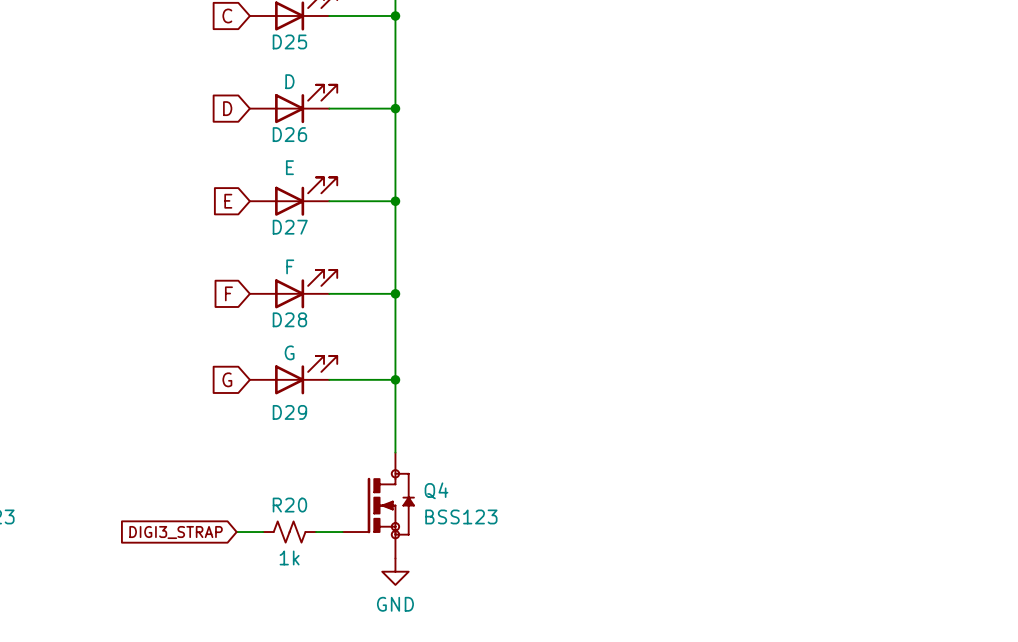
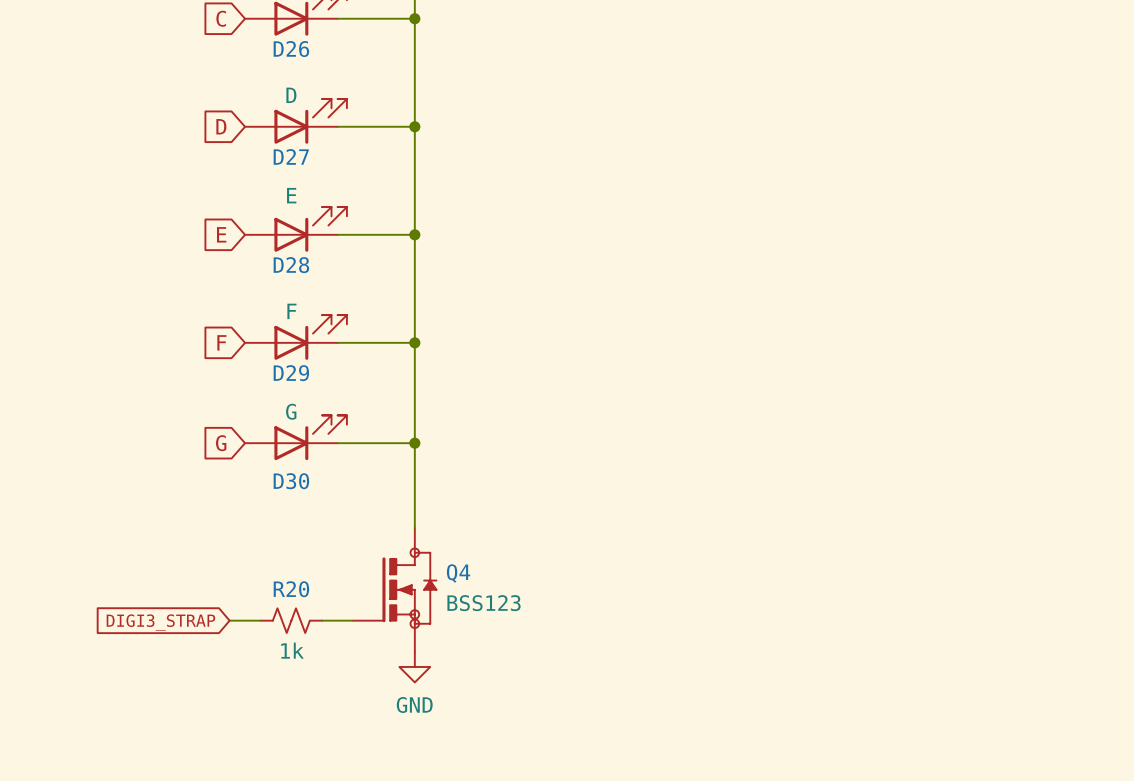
D25 name: D25 (289, 41) -> D26 (291, 49)
D26 name: D26 (289, 134) -> D27 (291, 156)
D27 name: D27 (290, 227) -> D28 (291, 265)
D28 name: D28 (289, 319) -> D29 (291, 373)
D29 name: D29 (289, 412) -> D30 (291, 481)

